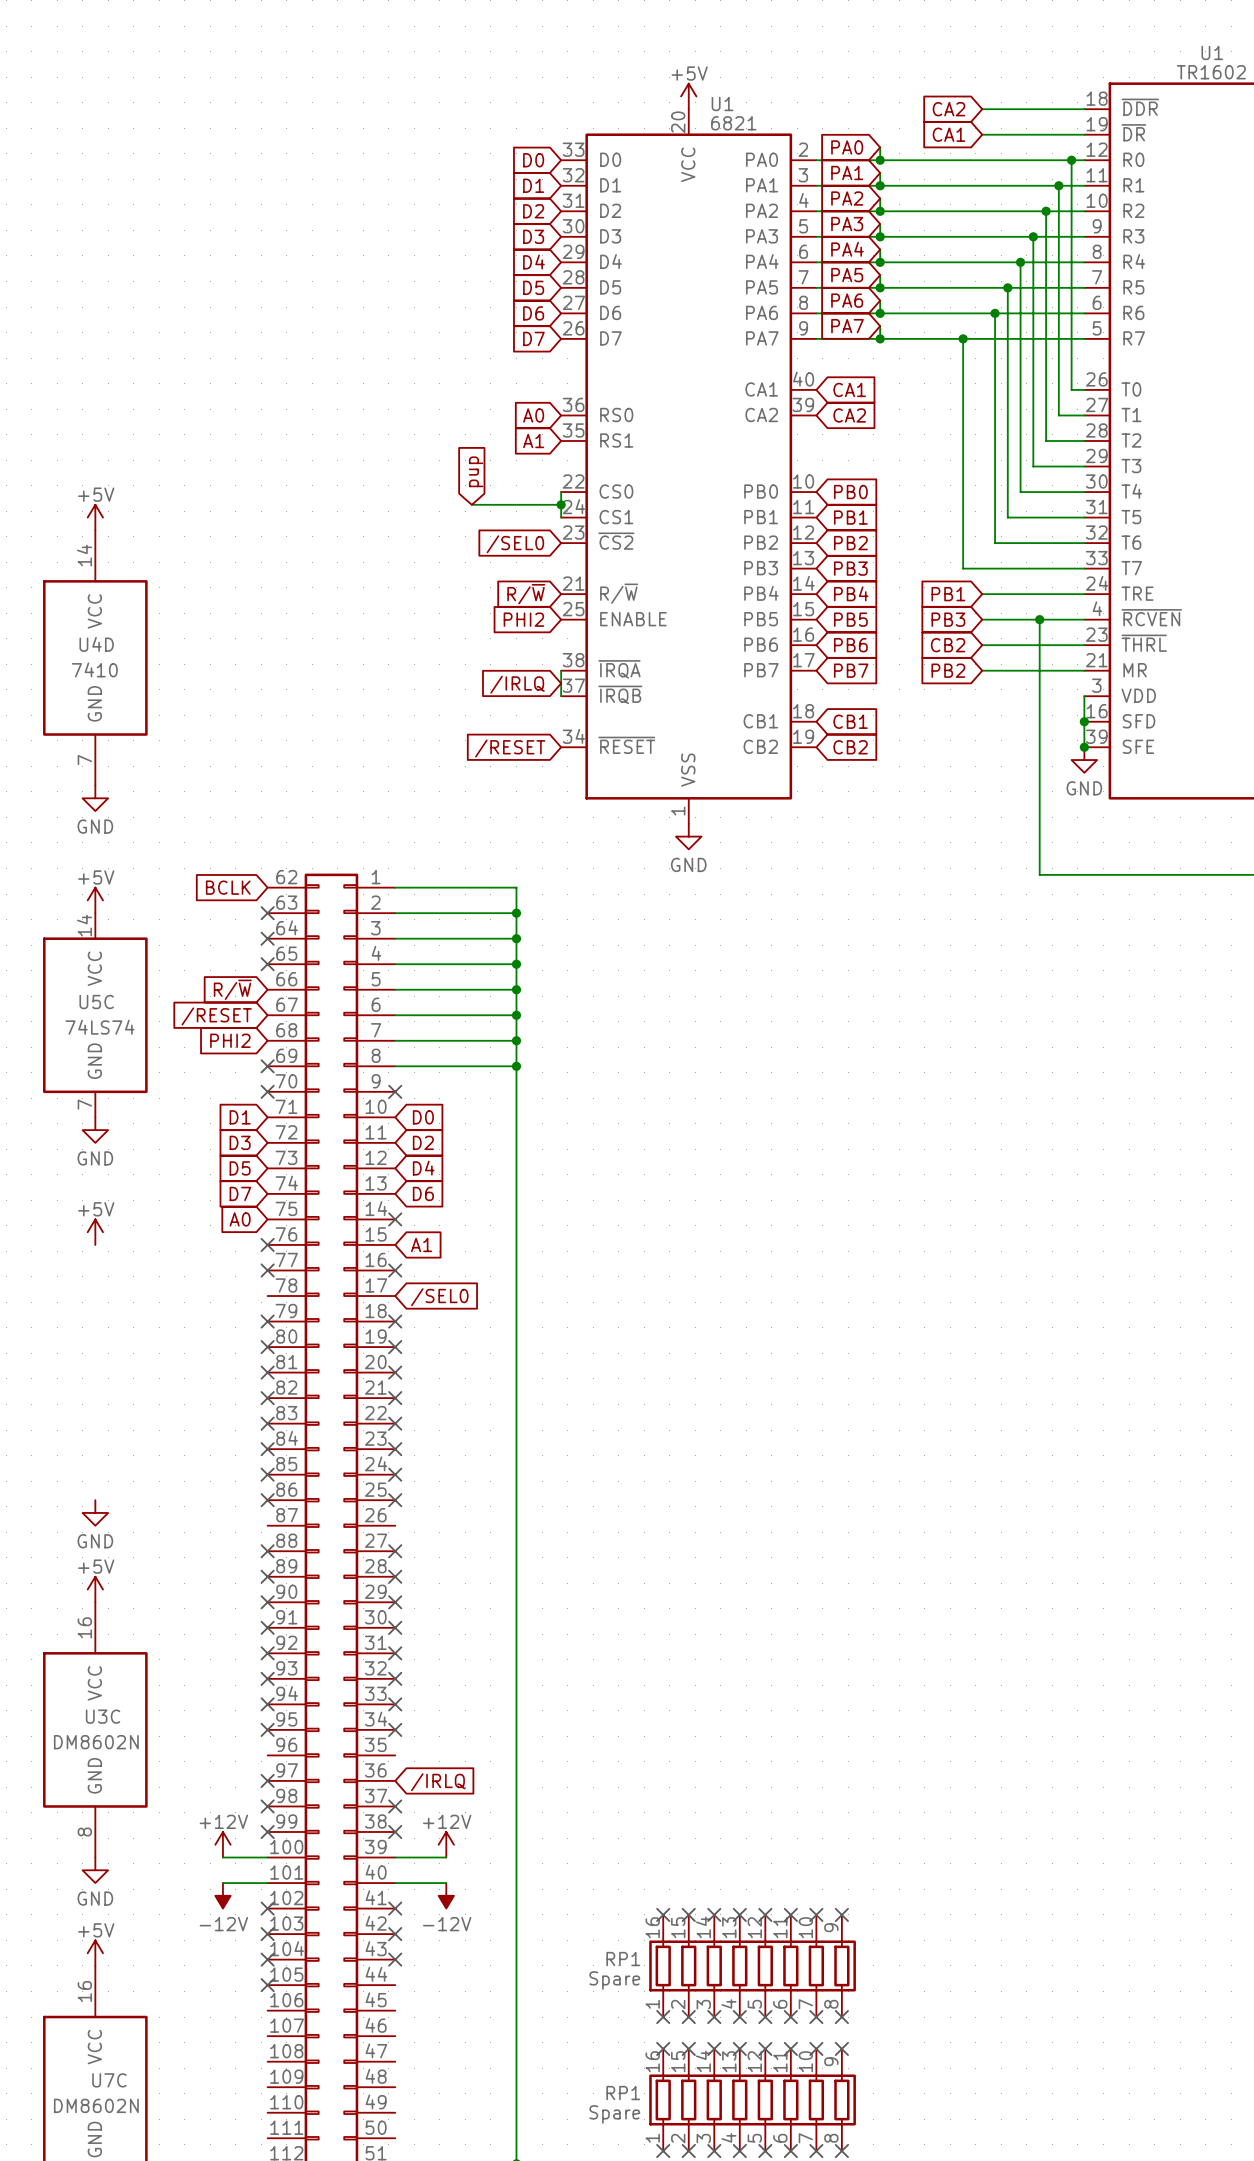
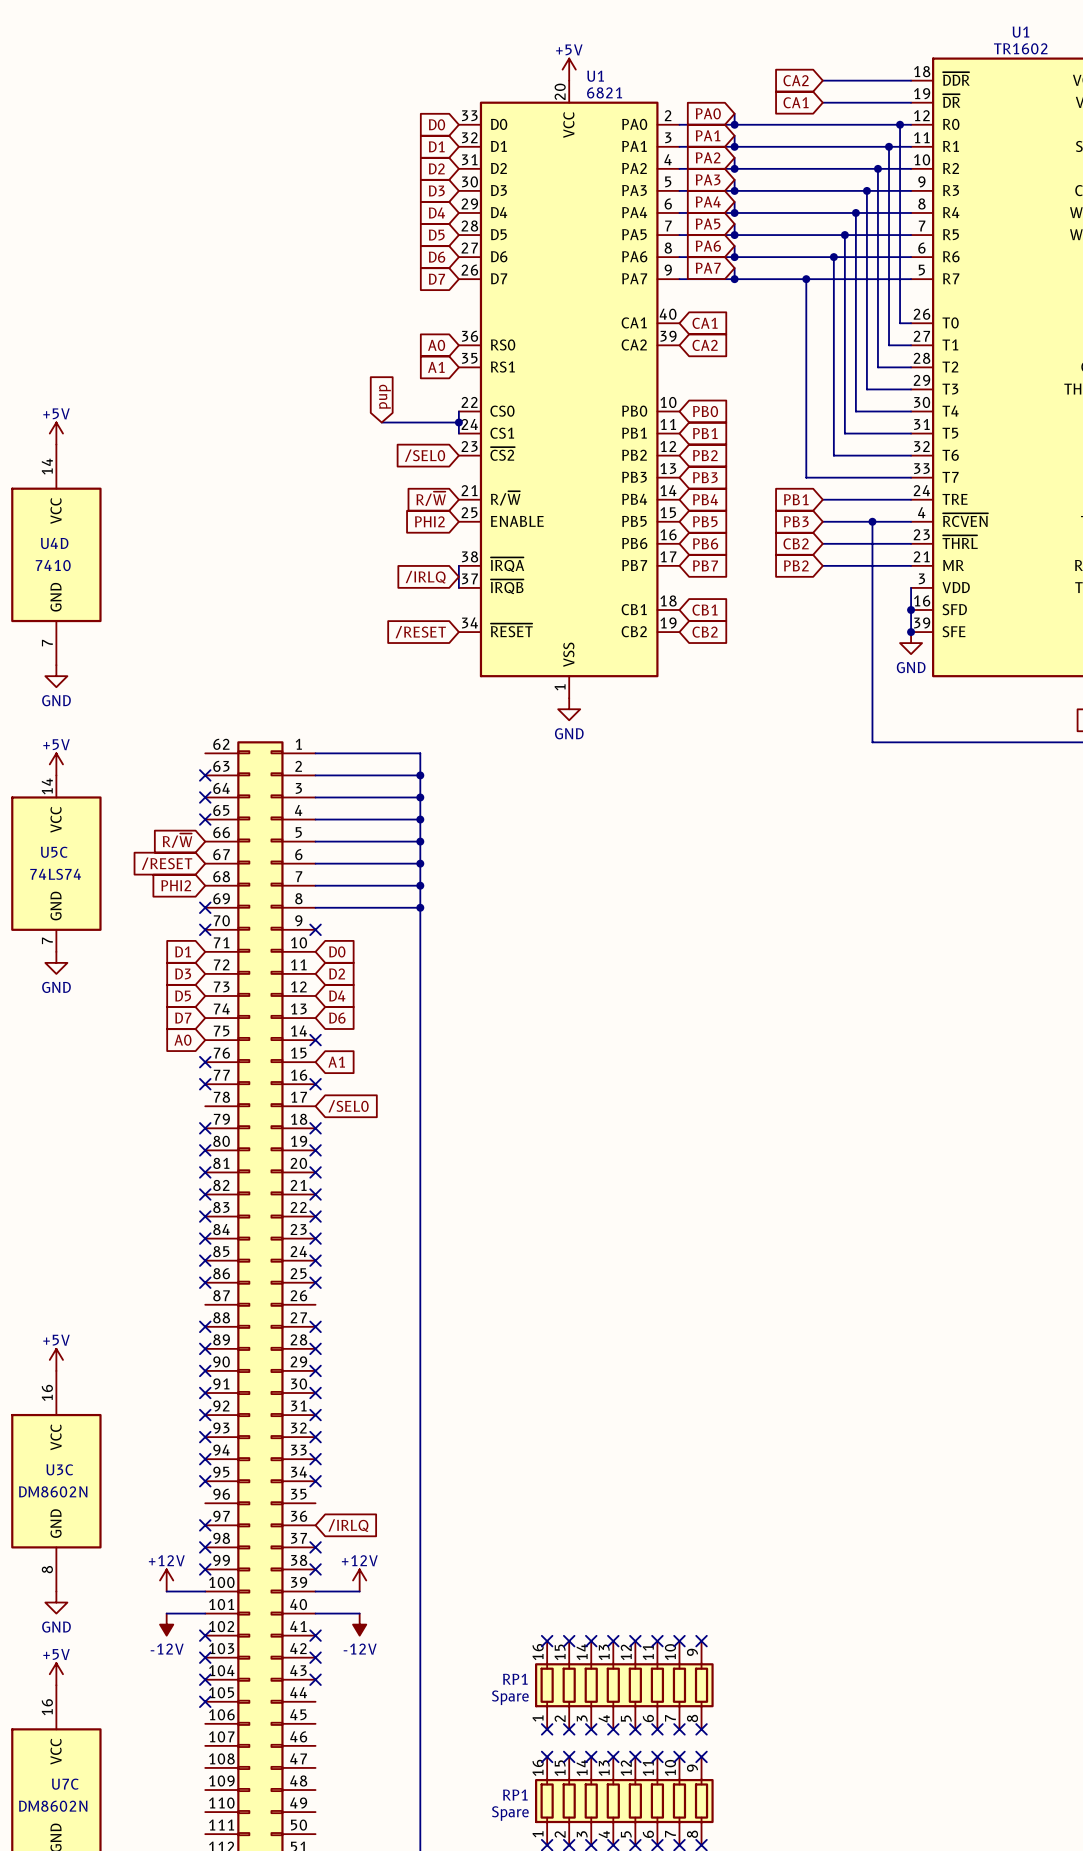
global label: BCLK (228, 887) -> none
power symbol: +5V (95, 1232) -> none
power symbol: GND (95, 1512) -> none

